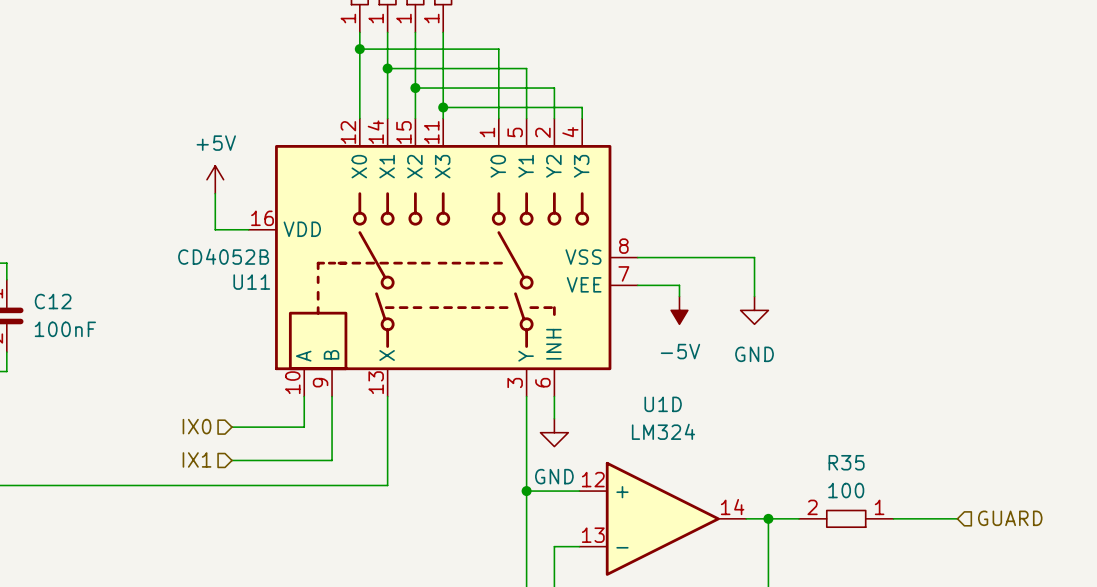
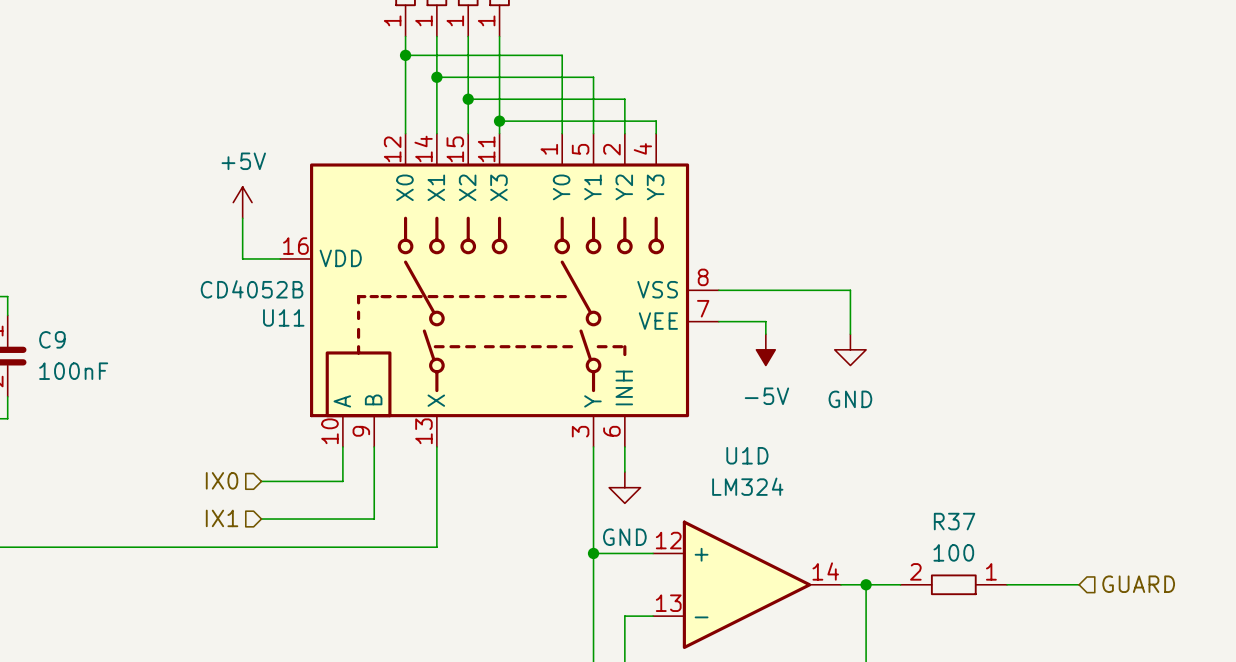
C12 name: C12 (53, 301) -> C9 (52, 339)
R35 name: R35 (846, 462) -> R37 (954, 521)

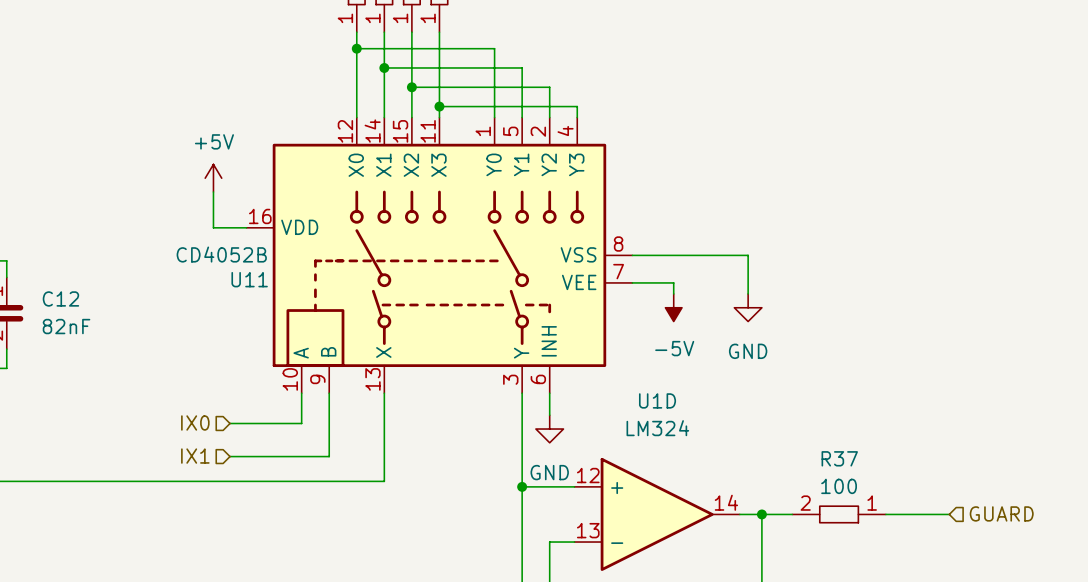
C9 name: C9 (52, 339) -> C12 (60, 298)
C9 text: 100nF (73, 371) -> 82nF (66, 326)

